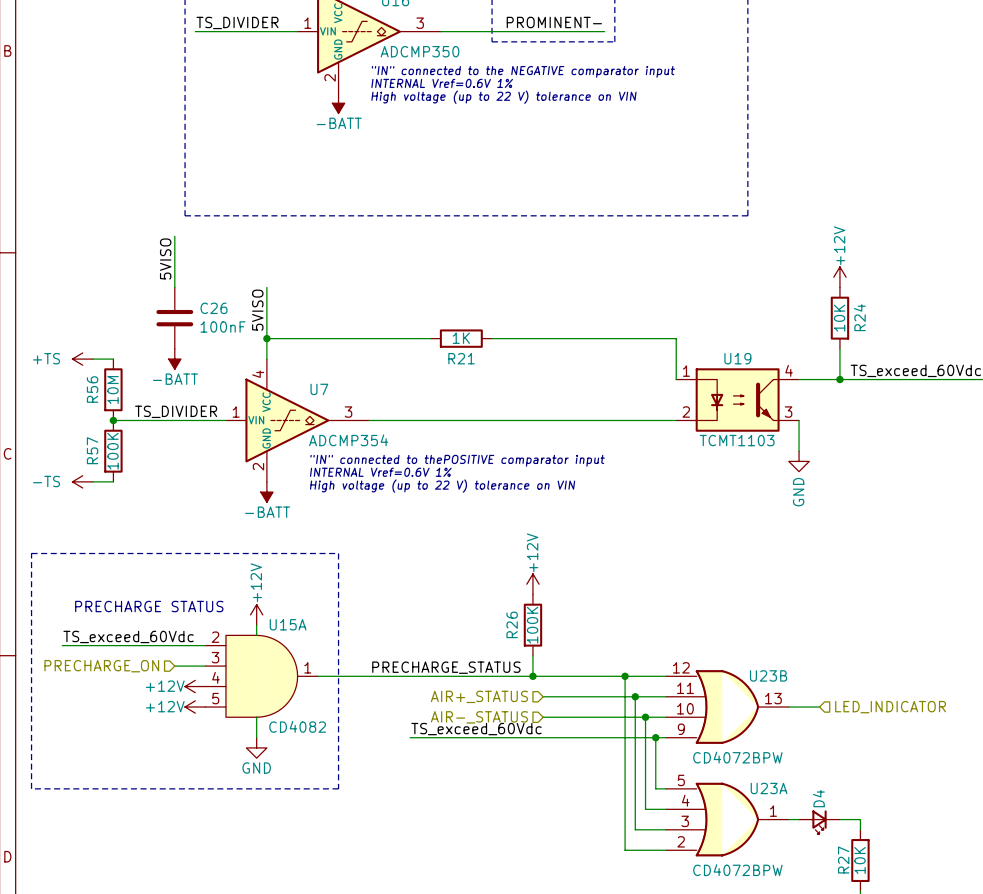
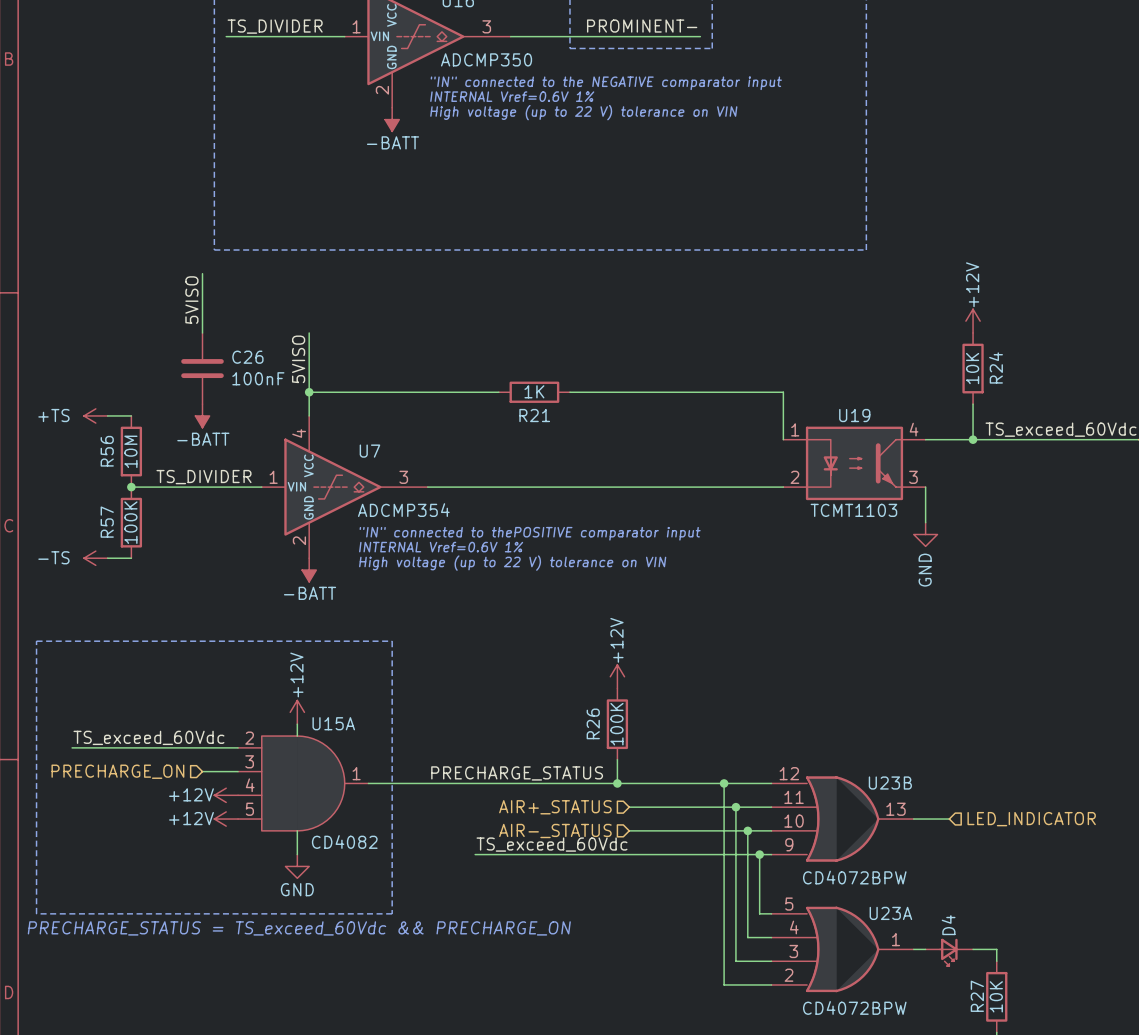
text: PRECHARGE STATUS (149, 606) -> none
text: none -> PRECHARGE_STATUS = TS_exceed_60Vdc && PRECHARGE_ON (299, 928)

